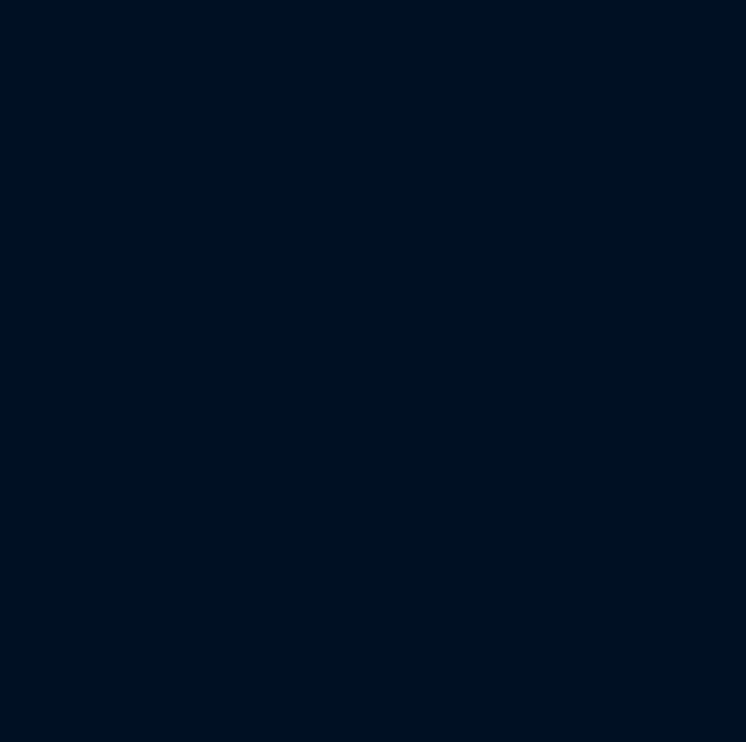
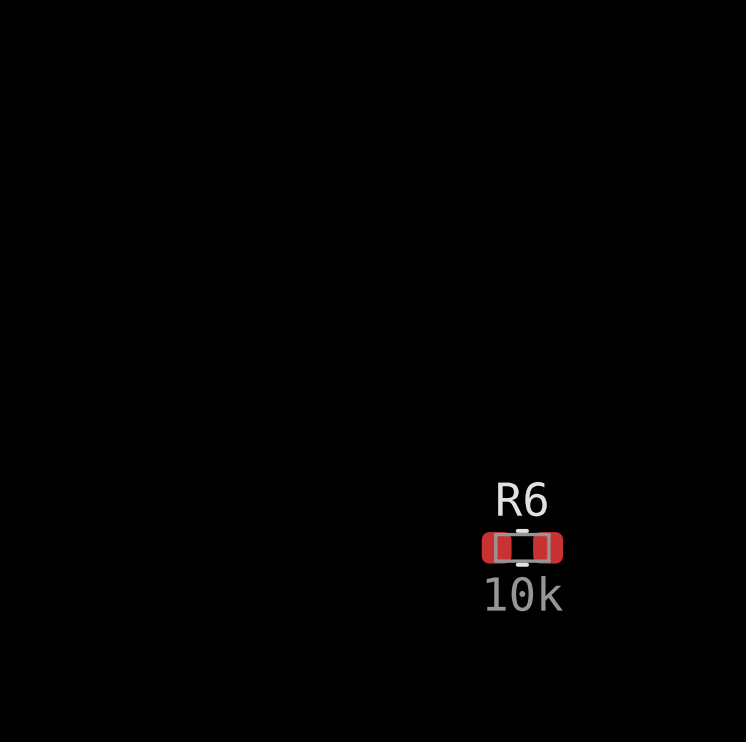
R6: none -> 10k (522, 547)

